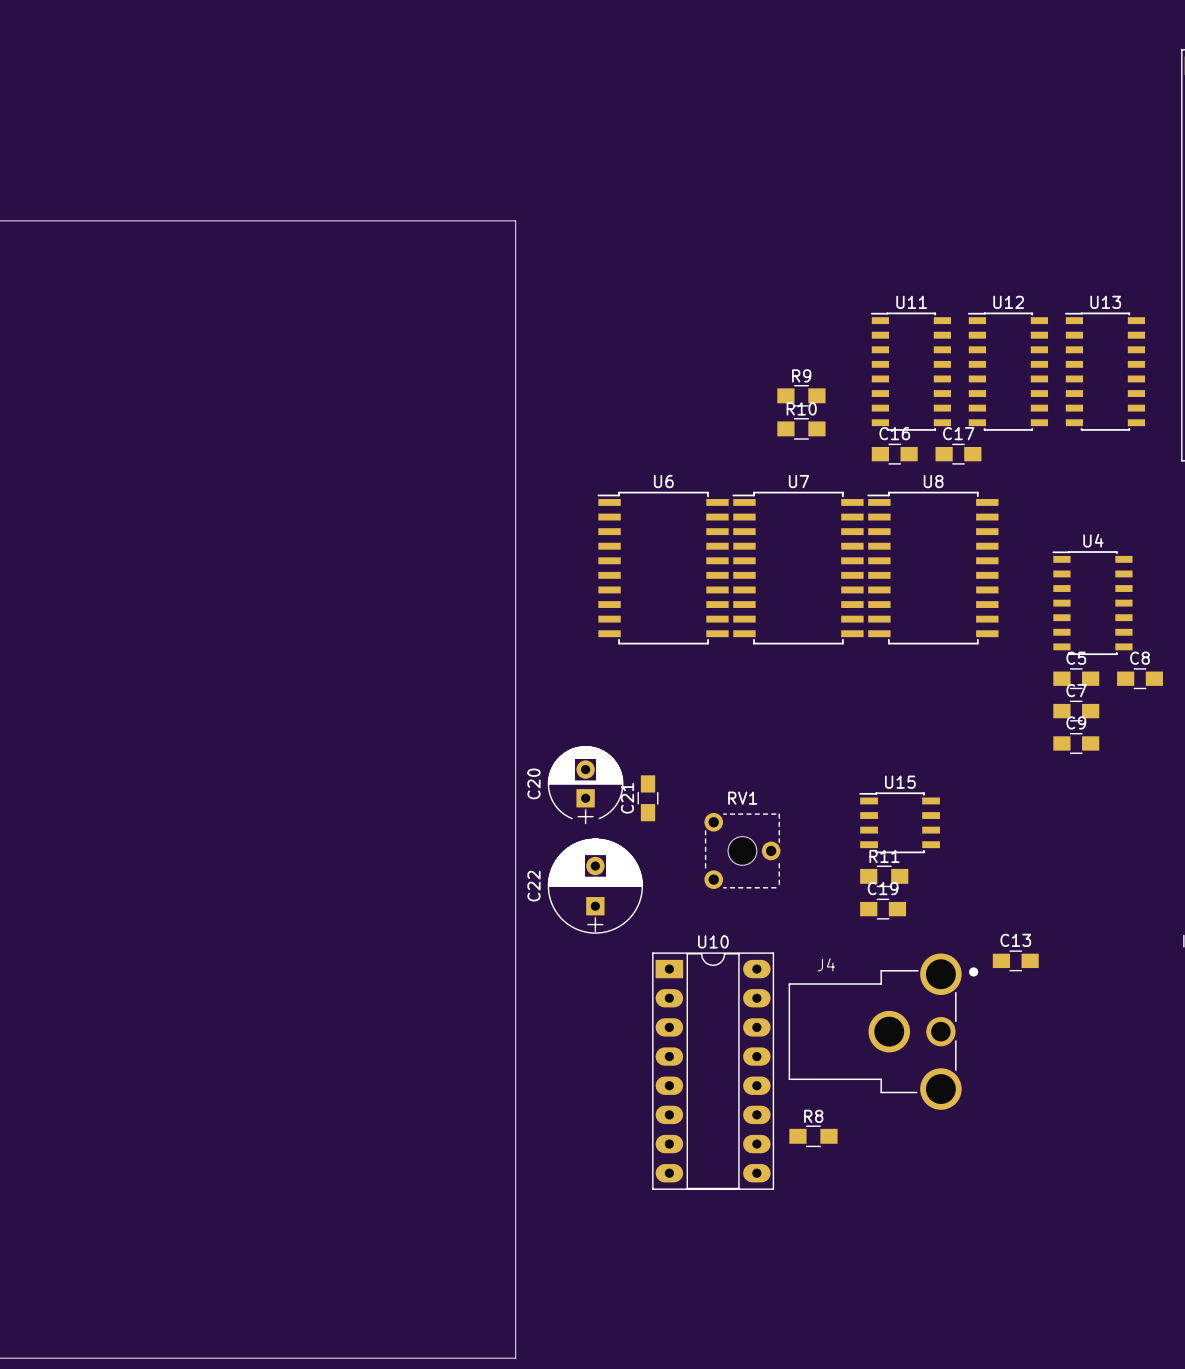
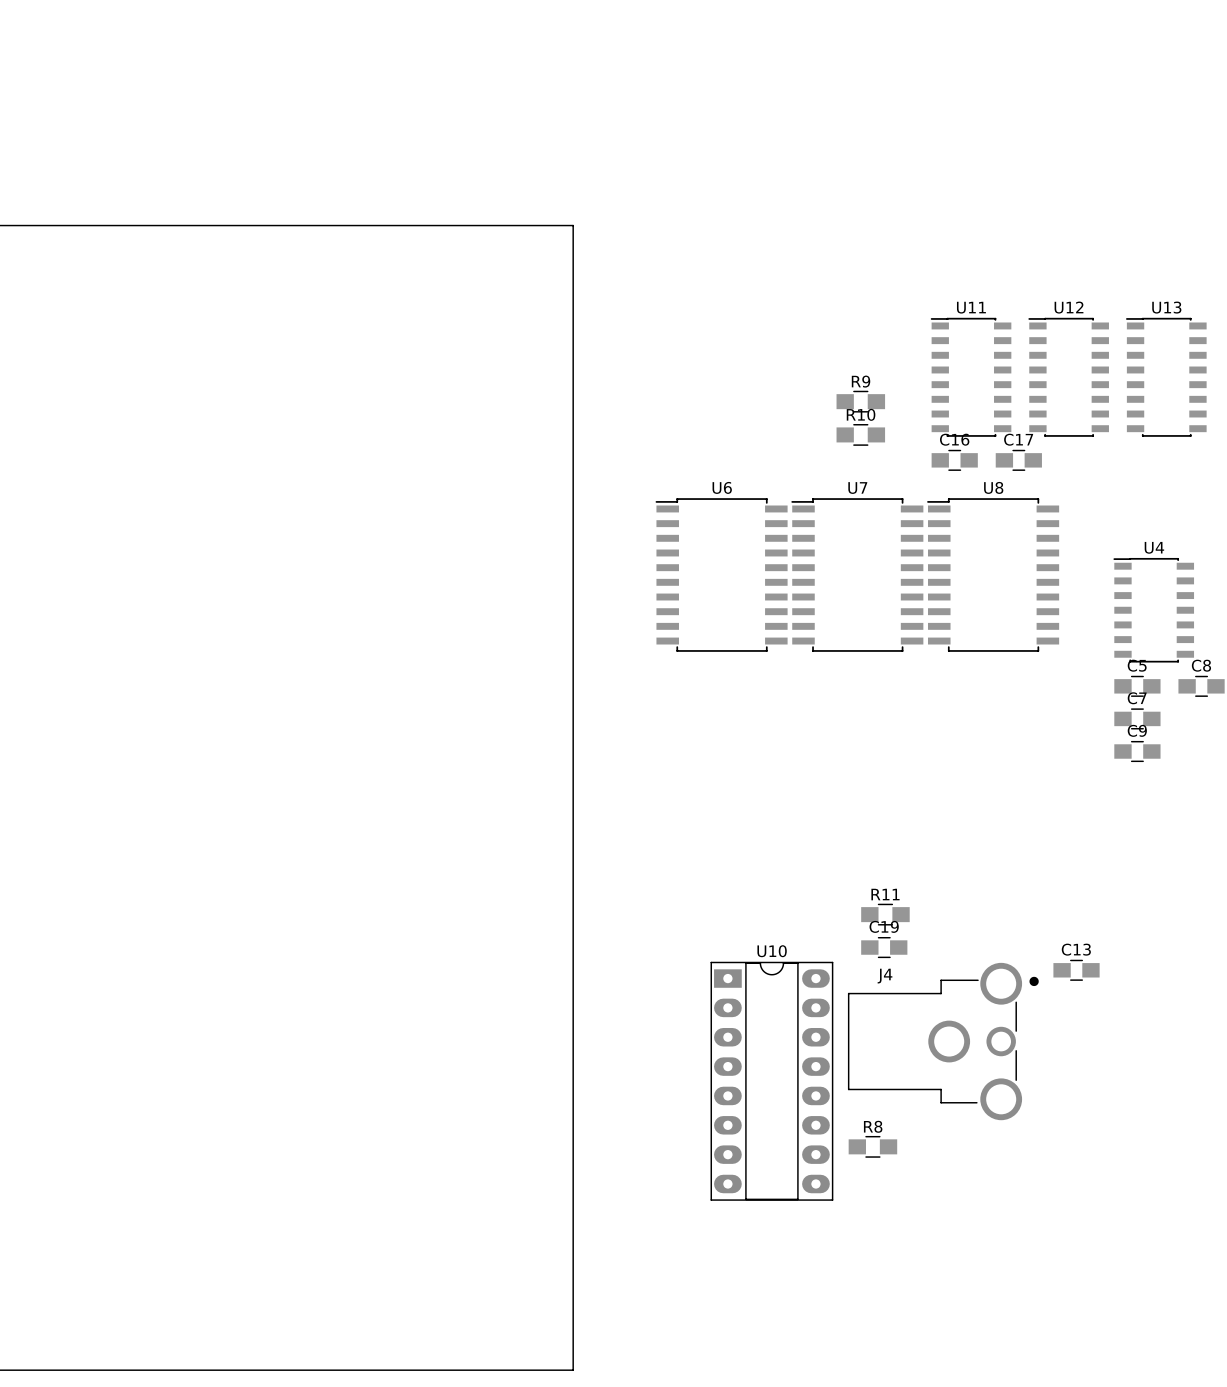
C20: (585, 785) -> none
C21: (648, 798) -> none
U15: (899, 822) -> none
RV1: (742, 850) -> none
R11 position: (884, 876) -> (885, 914)
C22: (595, 886) -> none
C19 position: (883, 909) -> (884, 947)

